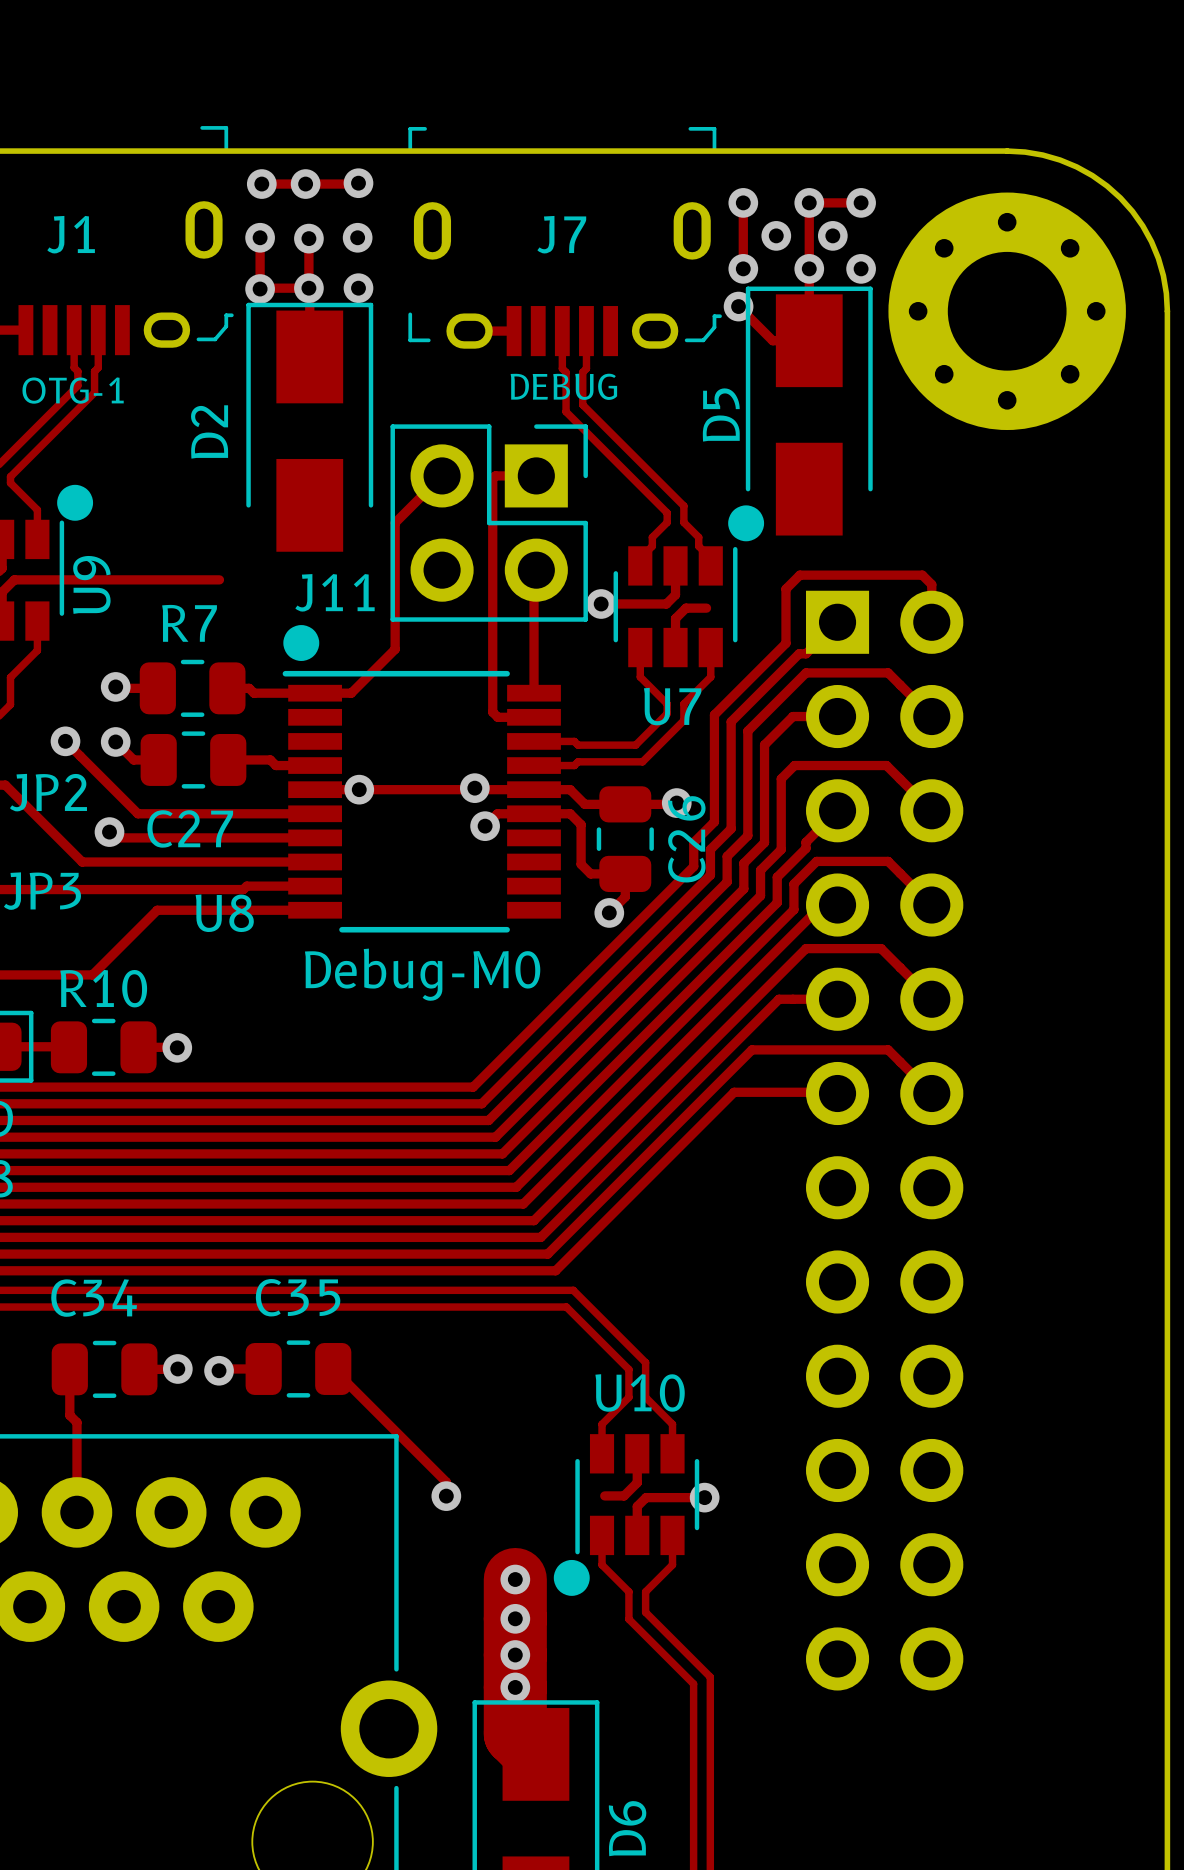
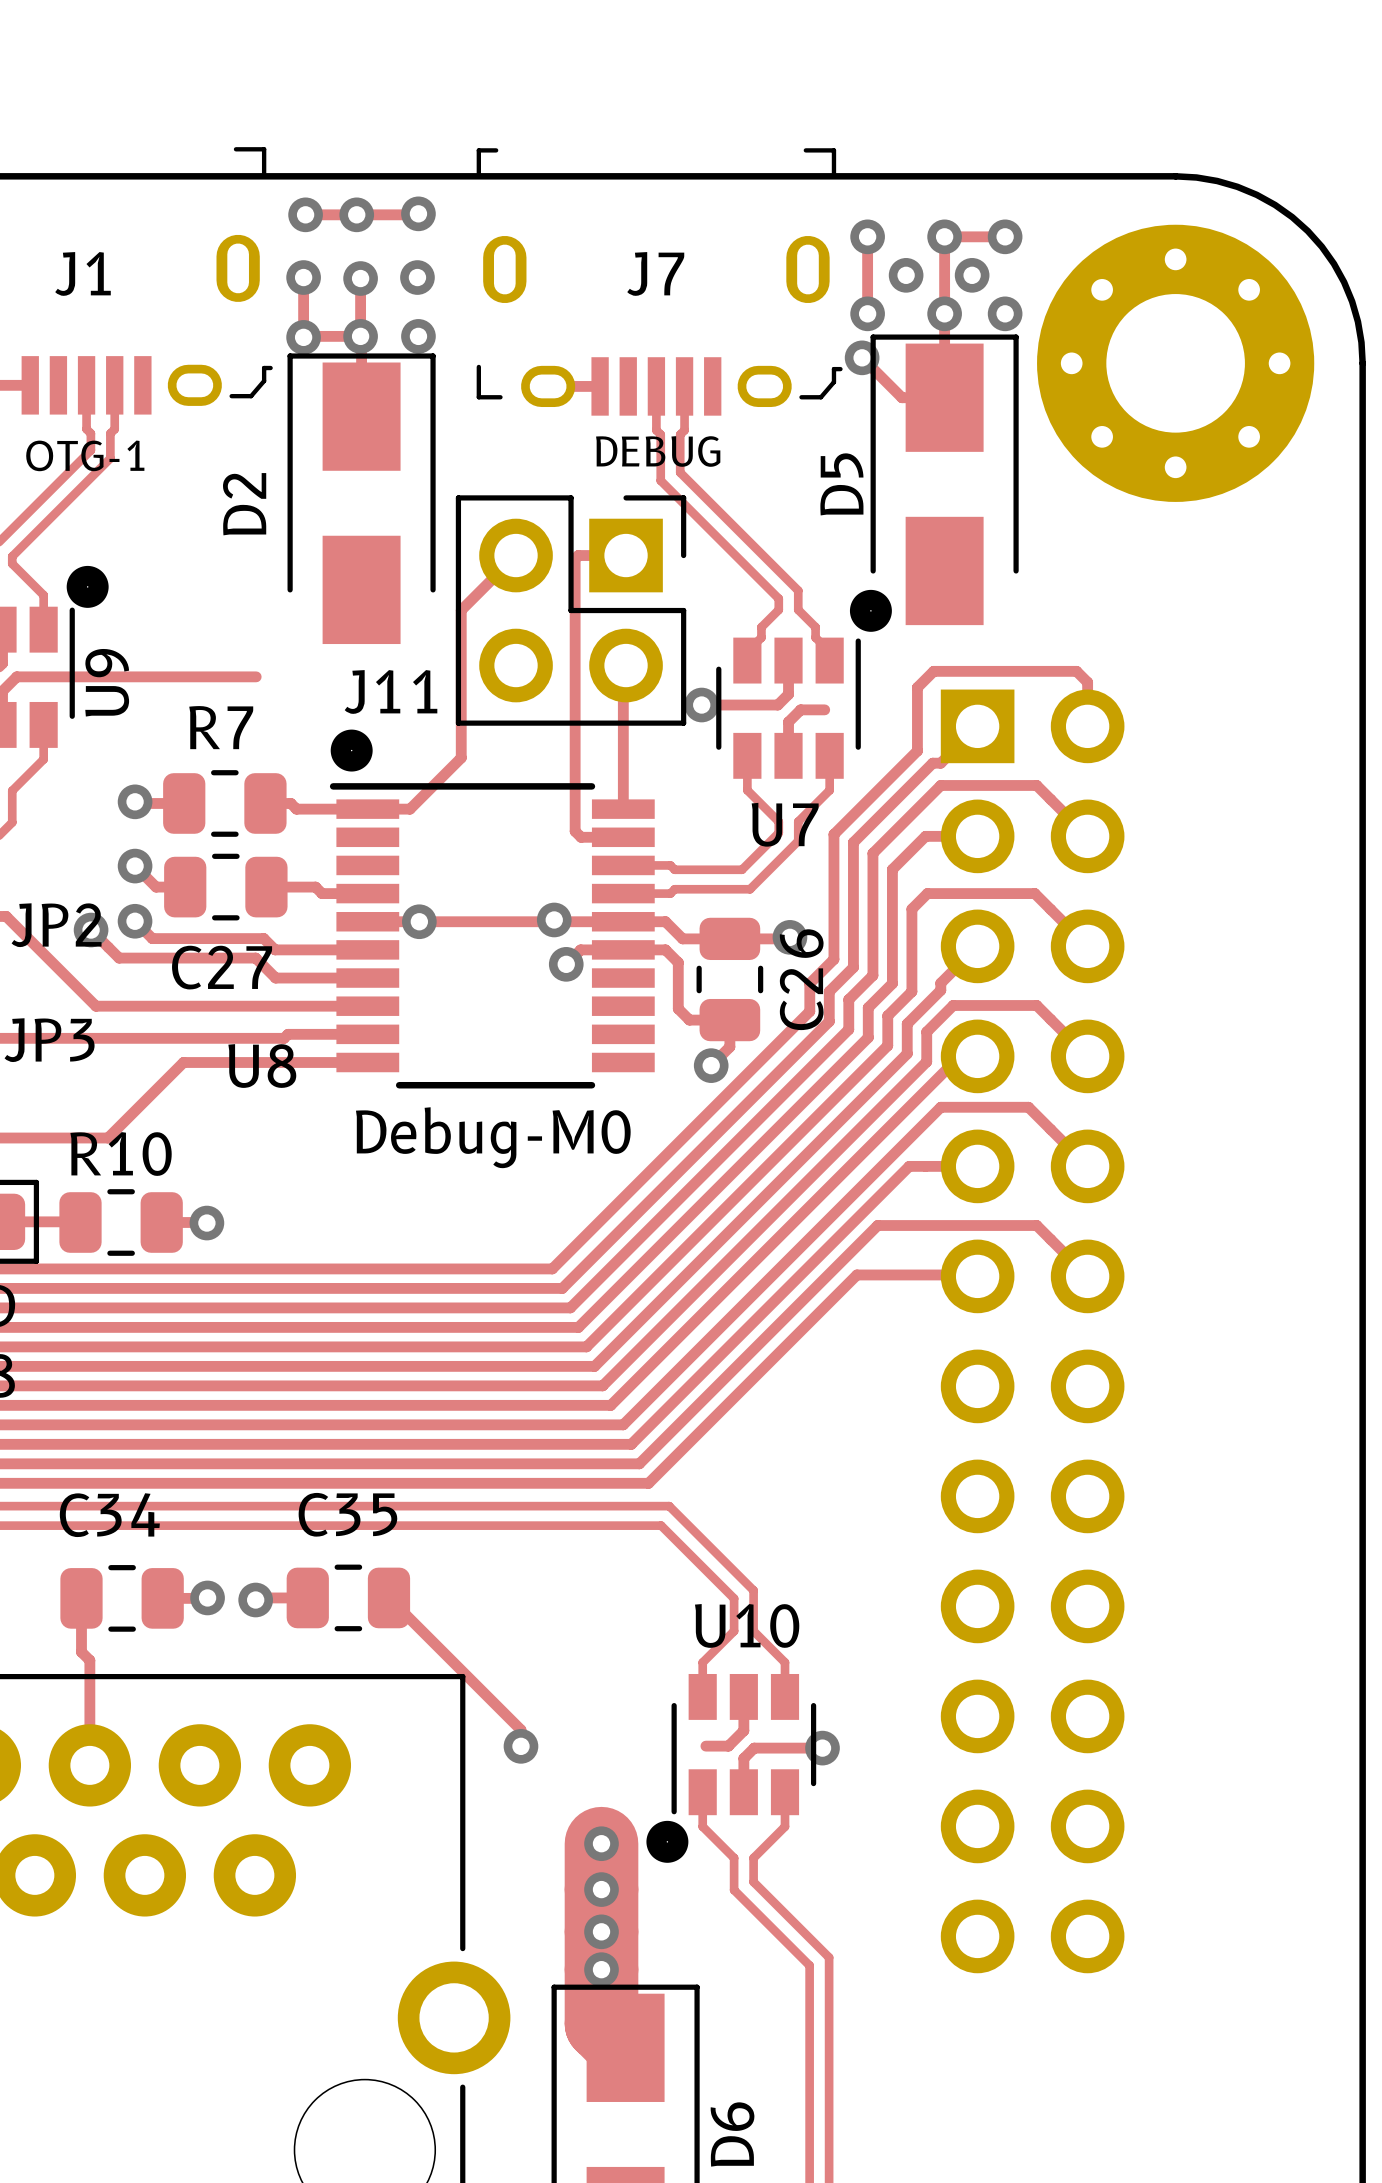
track: (65, 741) (137, 813) (235, 813) -> (135, 921) (152, 938) (263, 938) (275, 949)
via: (65, 741) -> none
via: none -> (135, 921)
via: none -> (91, 930)
track: (109, 832) (115, 837) (236, 837) -> (91, 930) (119, 958) (255, 958) (275, 978)
via: (109, 832) -> none

